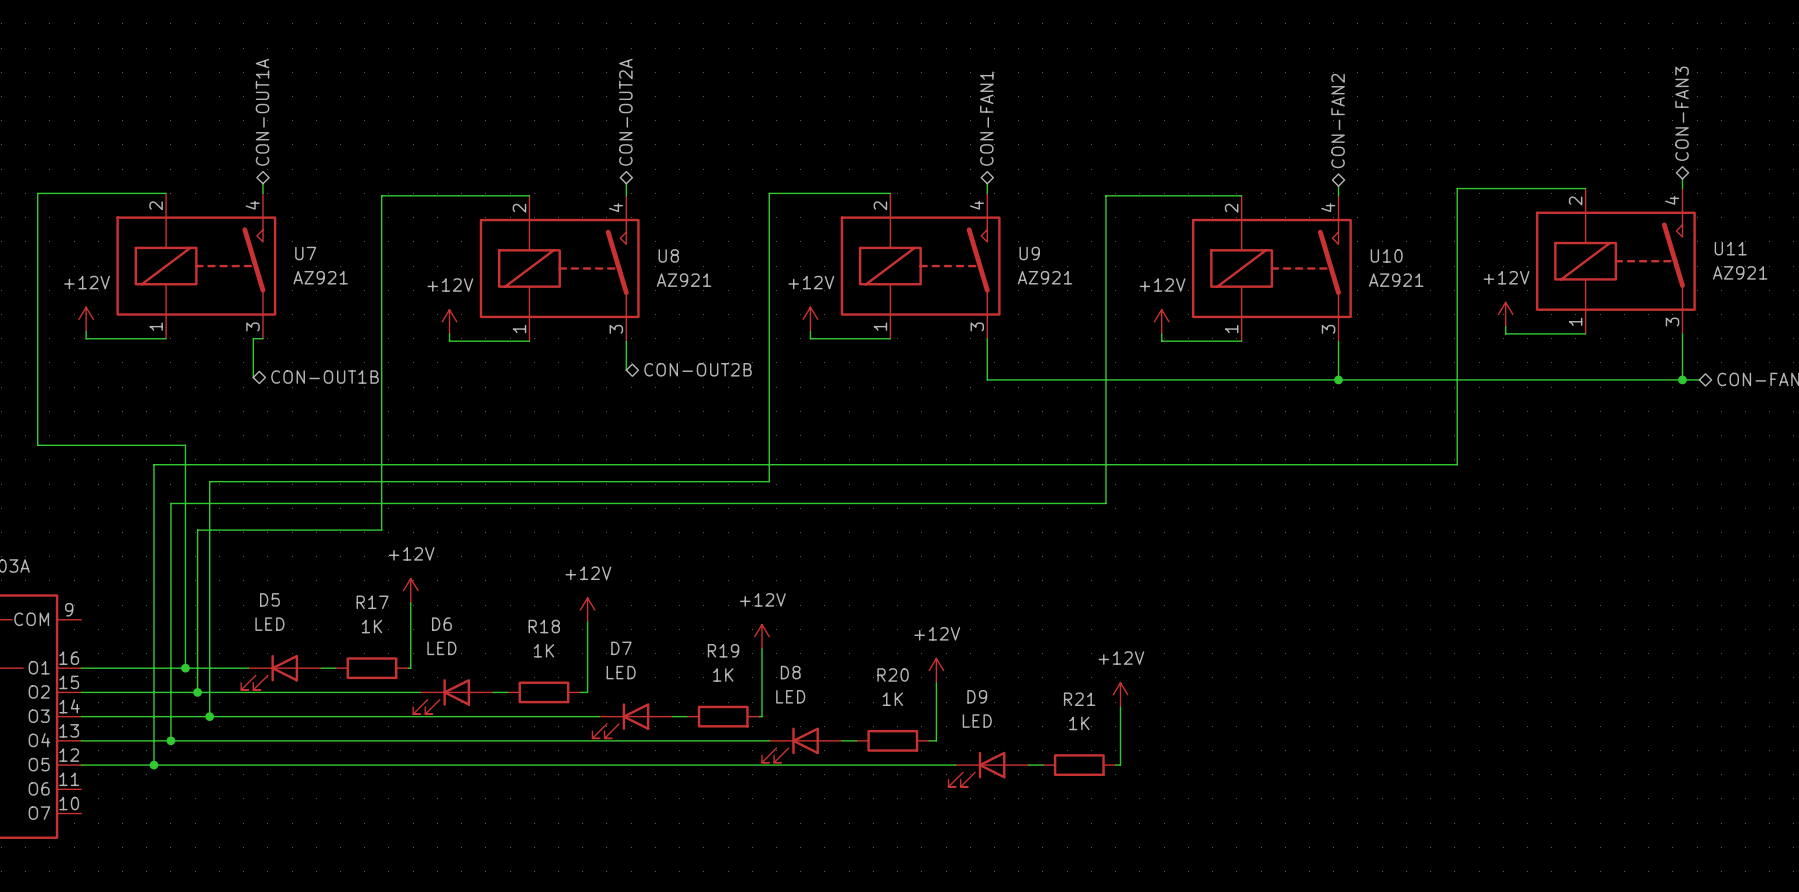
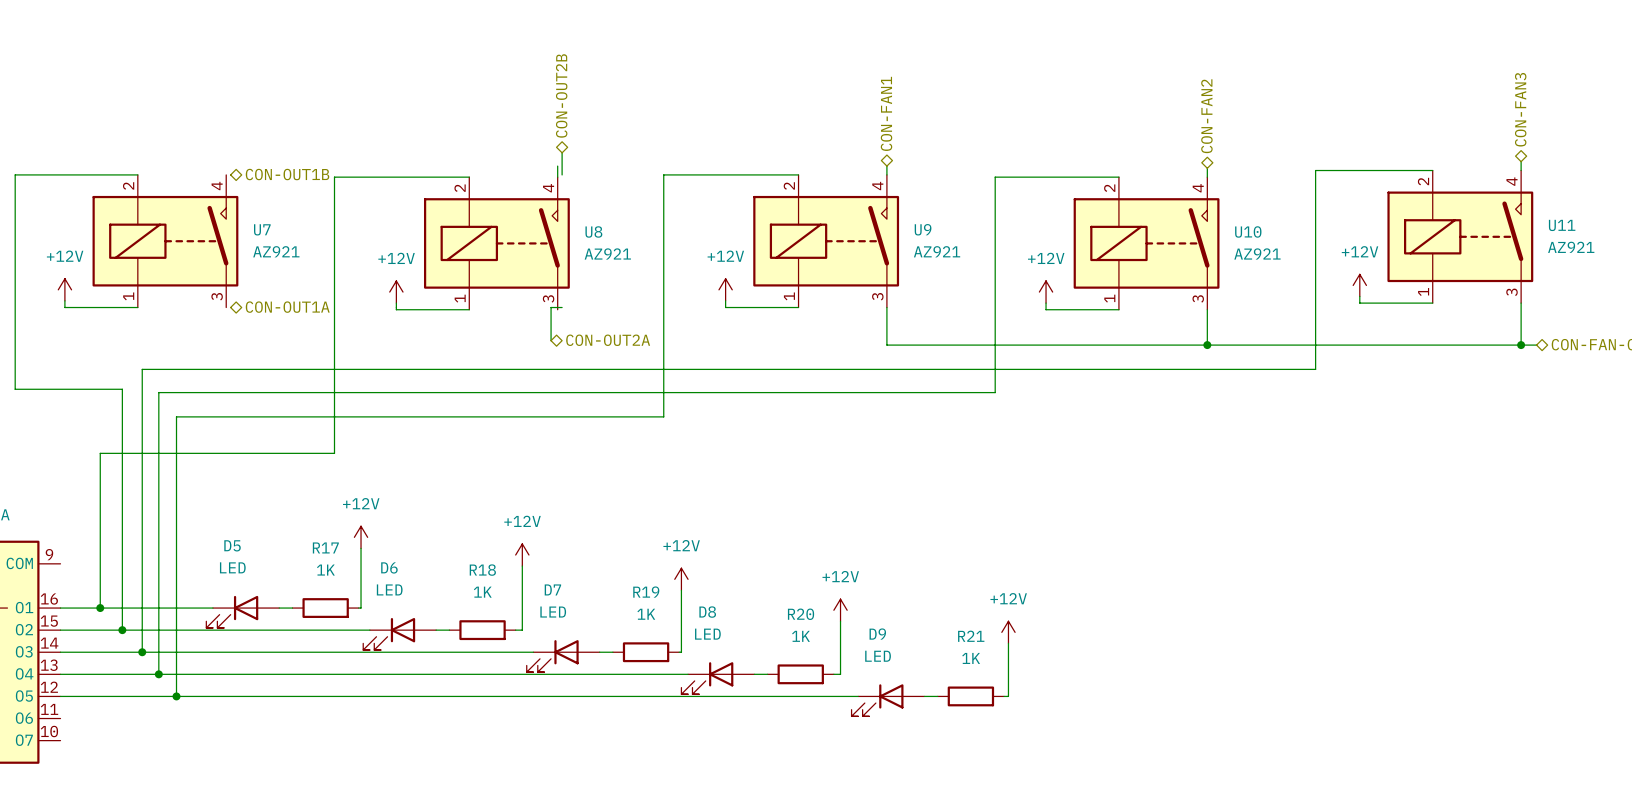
hierarchical label rotation: 0° (262, 112) -> 90° clockwise (287, 307)
hierarchical label position: CON-OUT1A (262, 112) -> CON-OUT1A (287, 307)
hierarchical label rotation: 0° (625, 112) -> 90° clockwise (608, 340)
hierarchical label position: CON-OUT2A (625, 112) -> CON-OUT2A (608, 340)
wire: none -> (562, 152) (562, 174)
wire: (262, 183) (262, 193) -> none
wire: (37, 193) (37, 445) (185, 445) (185, 668) -> (20, 174) (15, 174) (15, 389) (122, 389) (122, 630)
wire: (769, 193) (769, 481) (209, 481) (209, 716) -> (688, 174) (663, 174) (663, 416) (176, 416) (176, 696)
wire: (262, 338) (253, 338) (253, 377) -> none
wire: none -> (562, 307) (551, 307) (551, 340)
wire: (626, 341) (626, 370) -> none
hierarchical label rotation: 0° (698, 369) -> 90° counterclockwise (561, 95)
hierarchical label position: CON-OUT2B (698, 369) -> CON-OUT2B (561, 95)
hierarchical label position: CON-OUT1B (325, 377) -> CON-OUT1B (287, 174)
wire: (1457, 406) (1457, 464) (153, 464) (153, 765) -> (1315, 369) (142, 369) (142, 457)
wire: (1105, 432) (1105, 503) (170, 503) -> (995, 392) (158, 392) (158, 674)
wire: (381, 498) (381, 530) (197, 530) (197, 692) -> (334, 453) (100, 453) (100, 608)
junction: none -> (100, 608)
junction: (185, 668) -> none
junction: none -> (122, 630)
junction: (197, 692) -> none
wire: (170, 716) (170, 740) -> none
junction: none -> (142, 652)
junction: (209, 716) -> none
junction: (170, 740) -> none
junction: none -> (158, 674)
junction: (153, 765) -> none
junction: none -> (176, 696)

